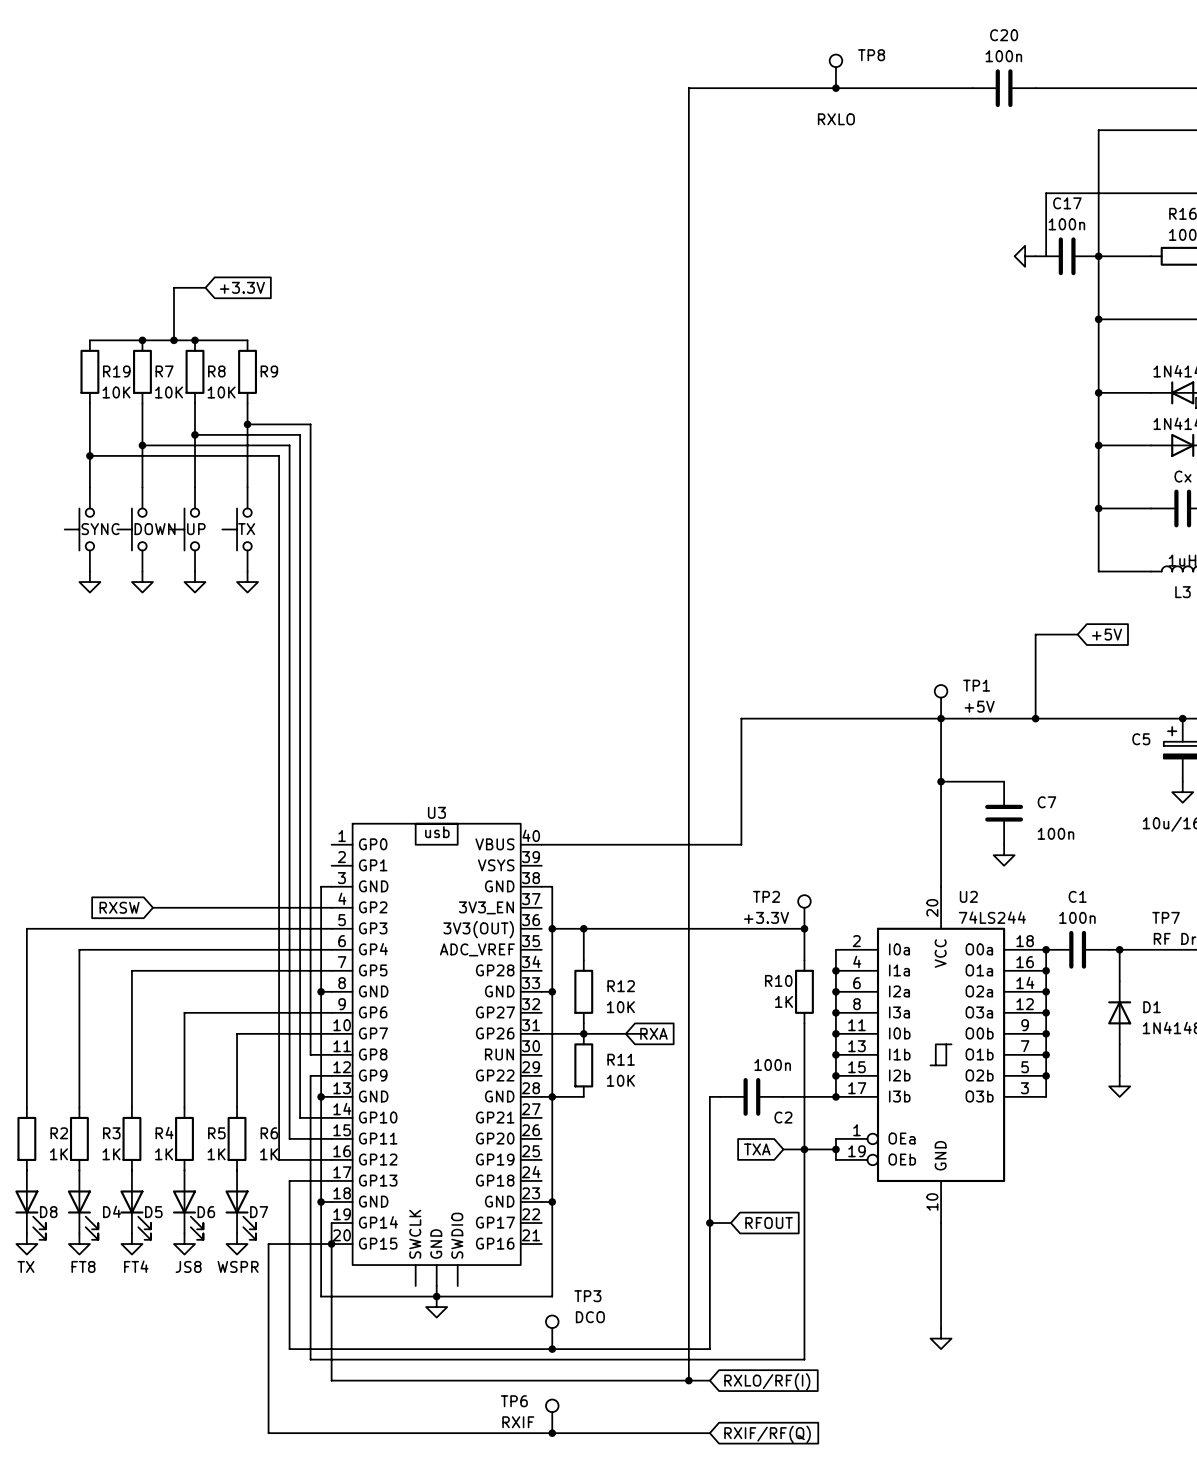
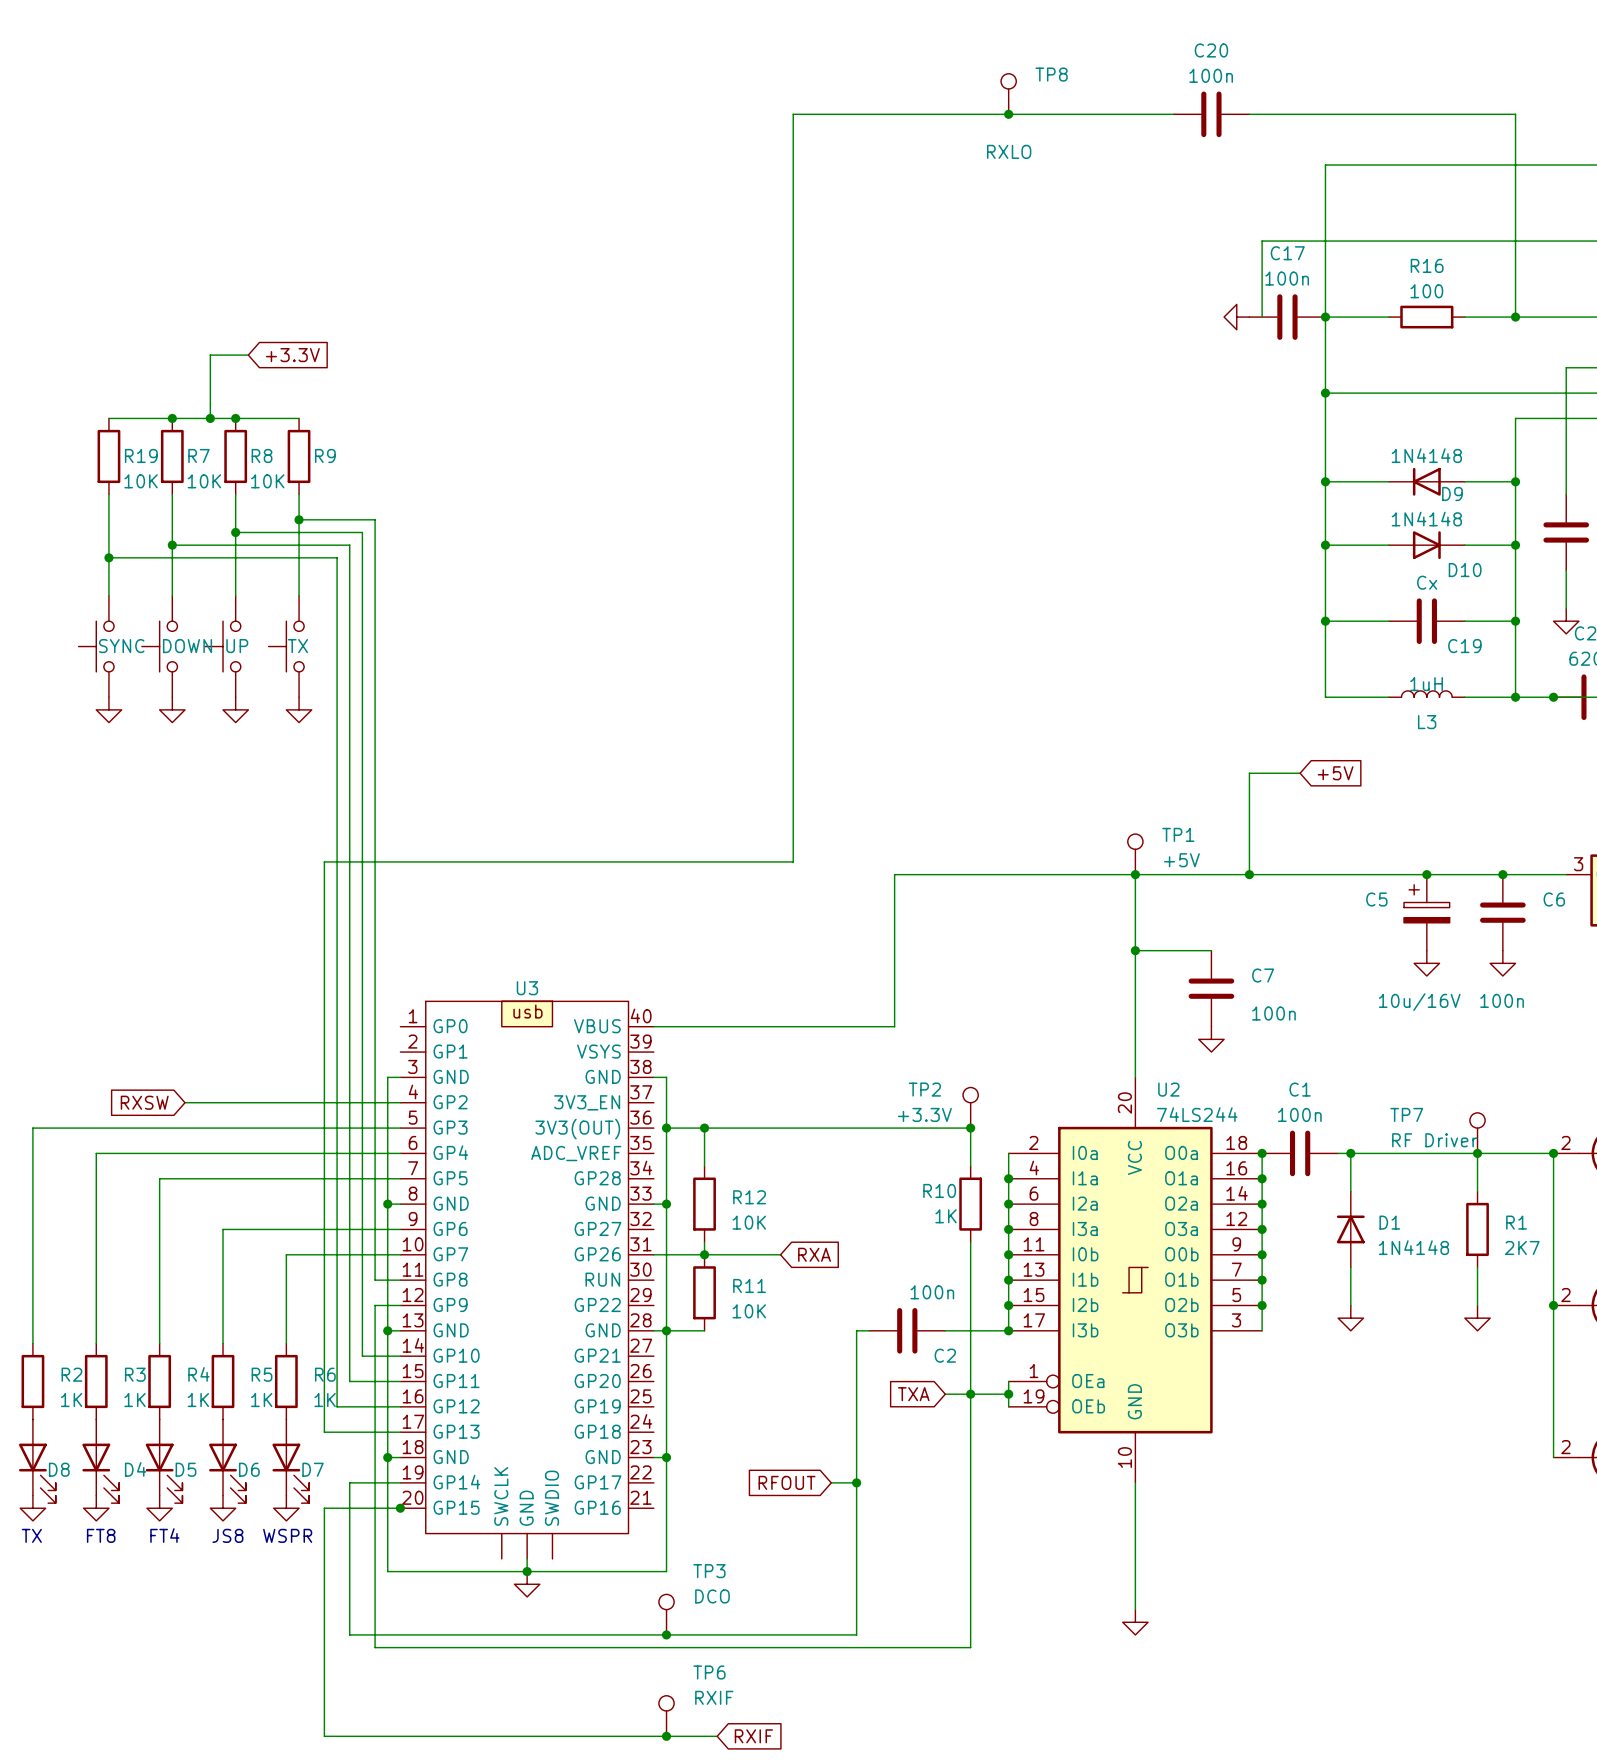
wire: (688, 88) (688, 1380) -> (831, 114) (793, 114) (793, 861) (324, 861) (324, 1432) (349, 1432)
global label position: RXA (653, 1033) -> RXA (814, 1254)
wire: (289, 1180) (289, 1223) -> (400, 1482) (349, 1482)
wire: (331, 1223) (331, 1380) (709, 1380) -> none
wire: (709, 1223) (730, 1223) -> (856, 1482) (831, 1482)
global label rotation: 0° (769, 1223) -> 180° (787, 1482)
global label position: RFOUT (769, 1223) -> RFOUT (787, 1482)
junction: (688, 1380) -> none
global label: RXLO/RF(I) (767, 1381) -> none
TP6 name position: TP6 (514, 1401) -> TP6 (709, 1672)
TP6 value position: RXIF (518, 1422) -> RXIF (714, 1697)
wire: (594, 1433) (709, 1433) -> none
global label: none -> RXIF (753, 1736)
global label: RXIF/RF(Q) (767, 1434) -> none

